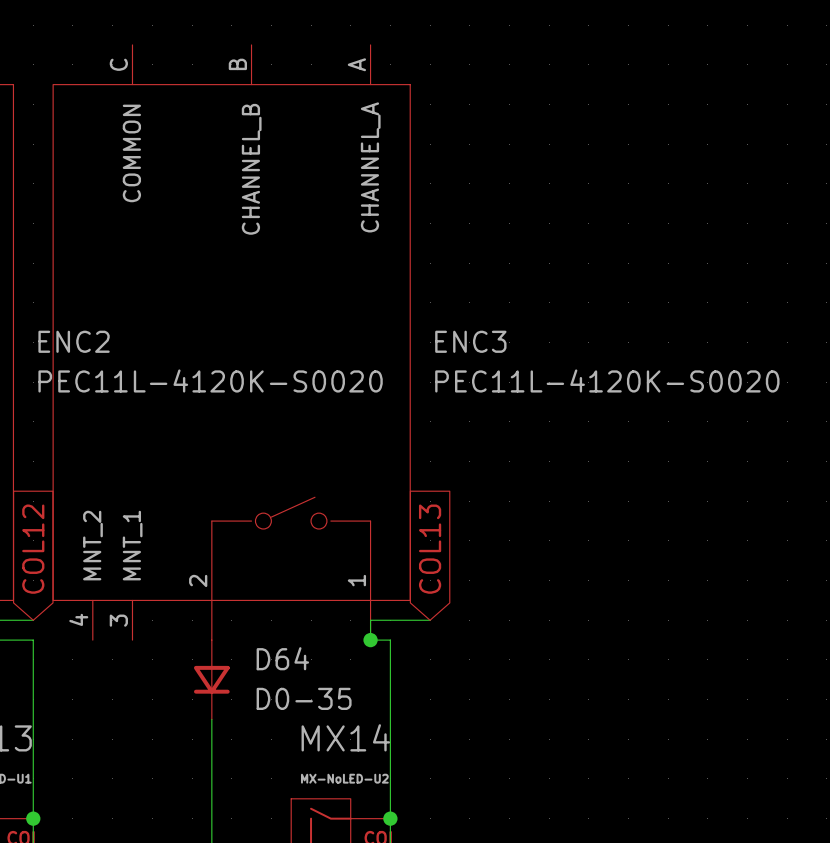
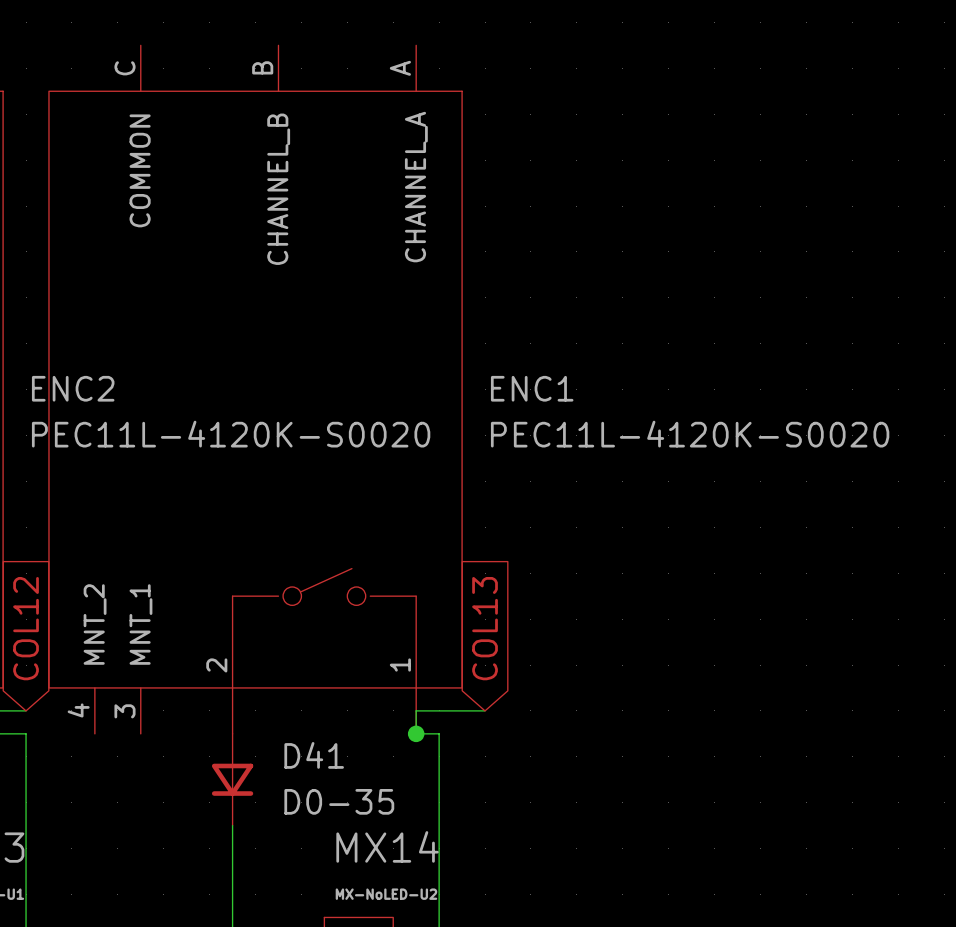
ENC3 name: ENC3 (470, 341) -> ENC1 (532, 388)
D64 name: D64 (282, 658) -> D41 (314, 755)

